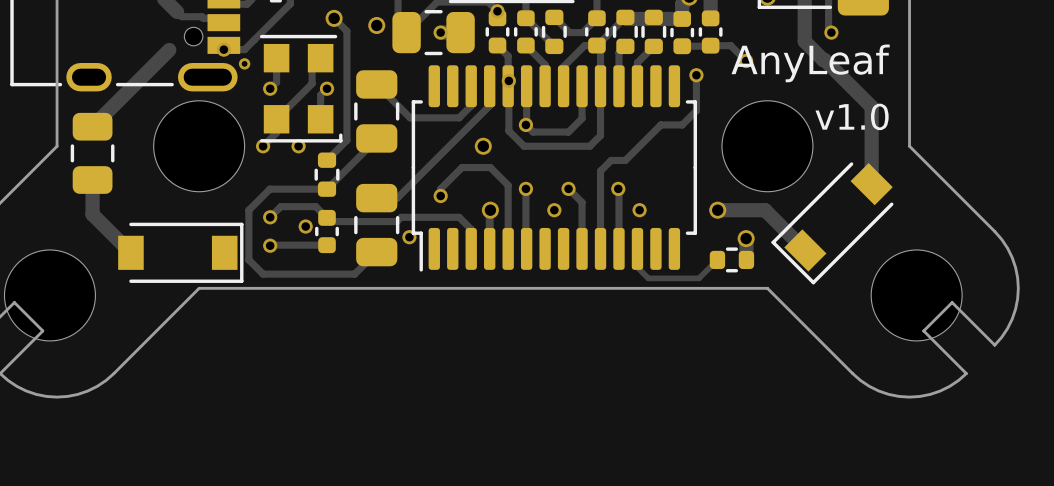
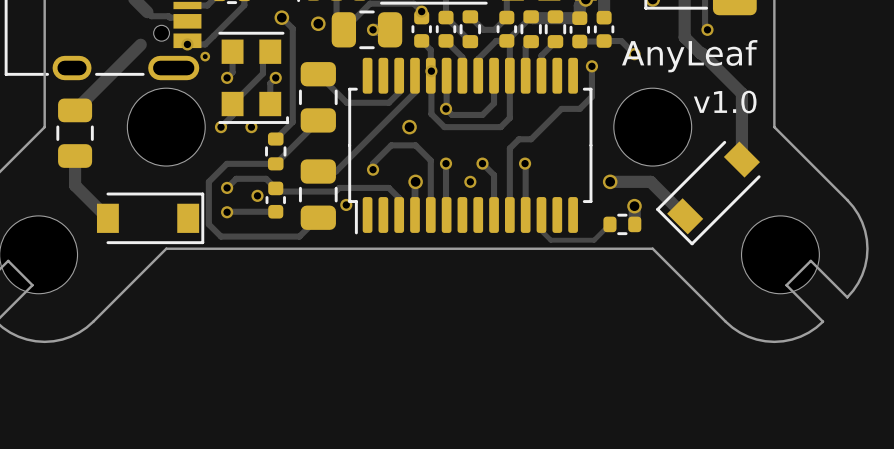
via: (639, 210) -> none

